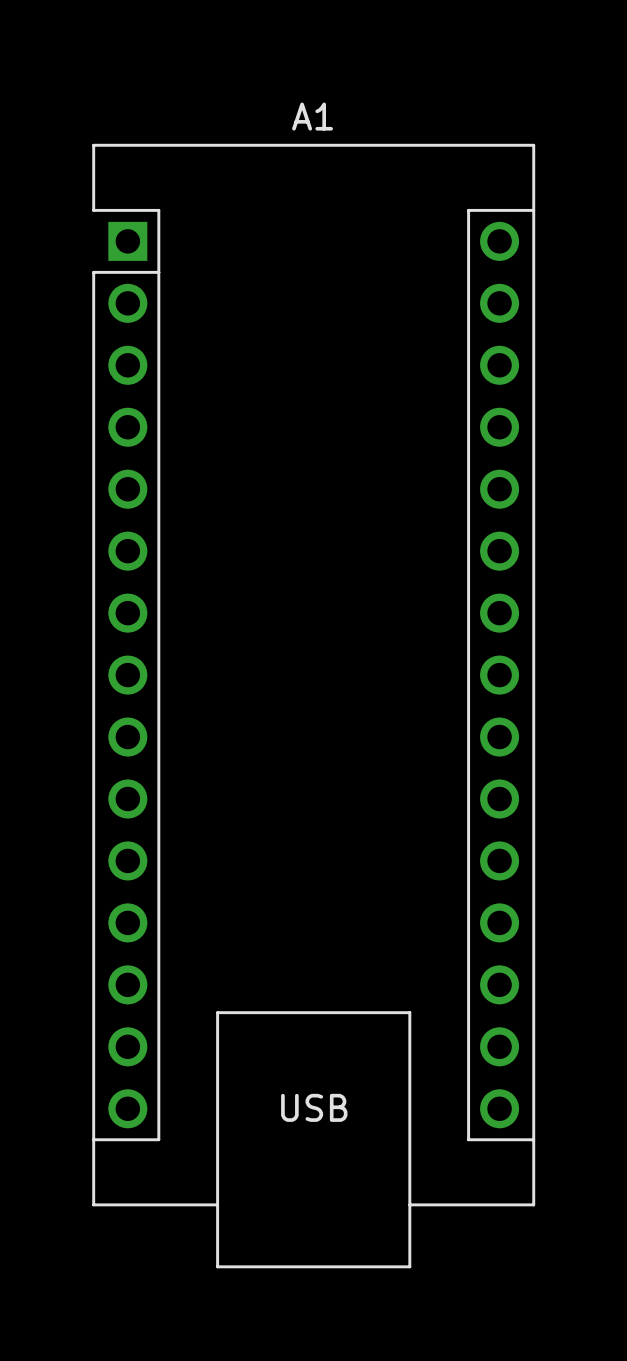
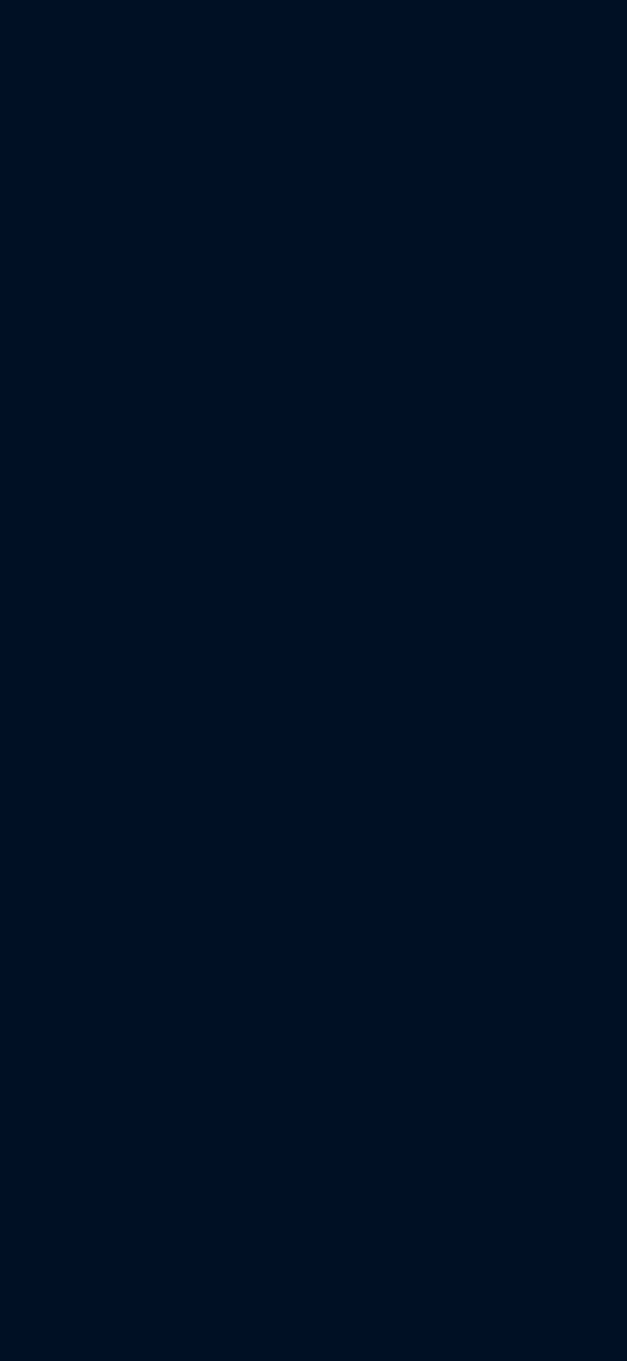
A1: (313, 706) -> none

